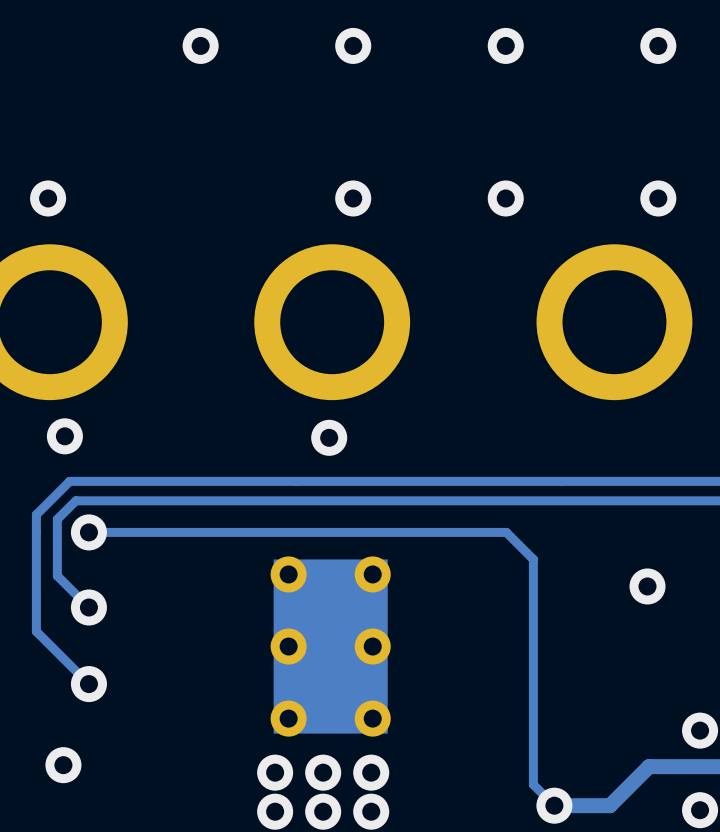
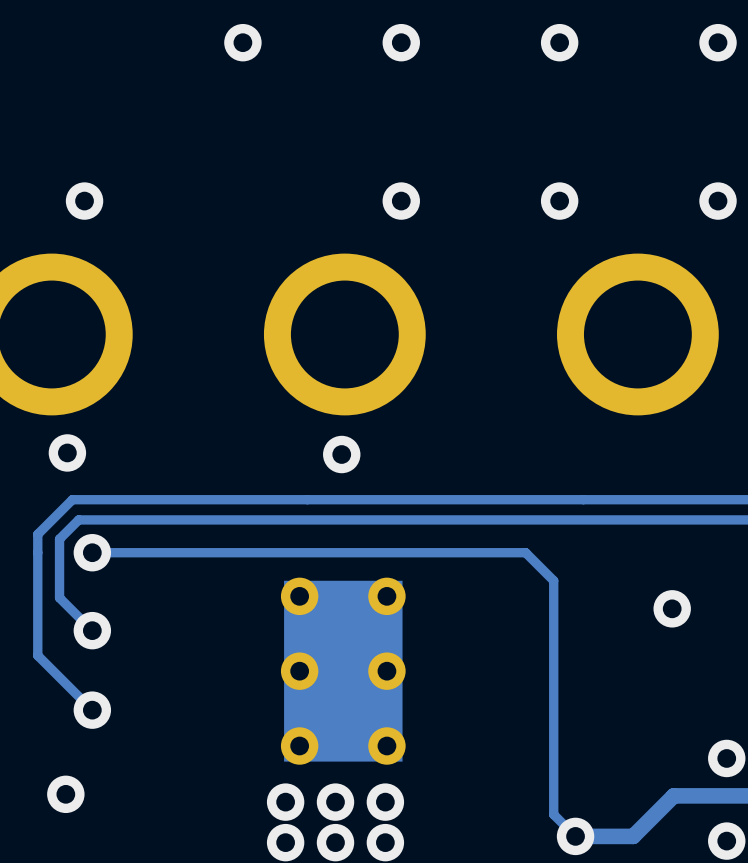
via position: (200, 45) -> (242, 42)
via position: (353, 45) -> (401, 42)
via position: (505, 45) -> (559, 42)
via position: (658, 45) -> (718, 42)
via position: (48, 198) -> (84, 201)
via position: (353, 198) -> (401, 201)
via position: (505, 198) -> (559, 201)
via position: (658, 198) -> (718, 201)

